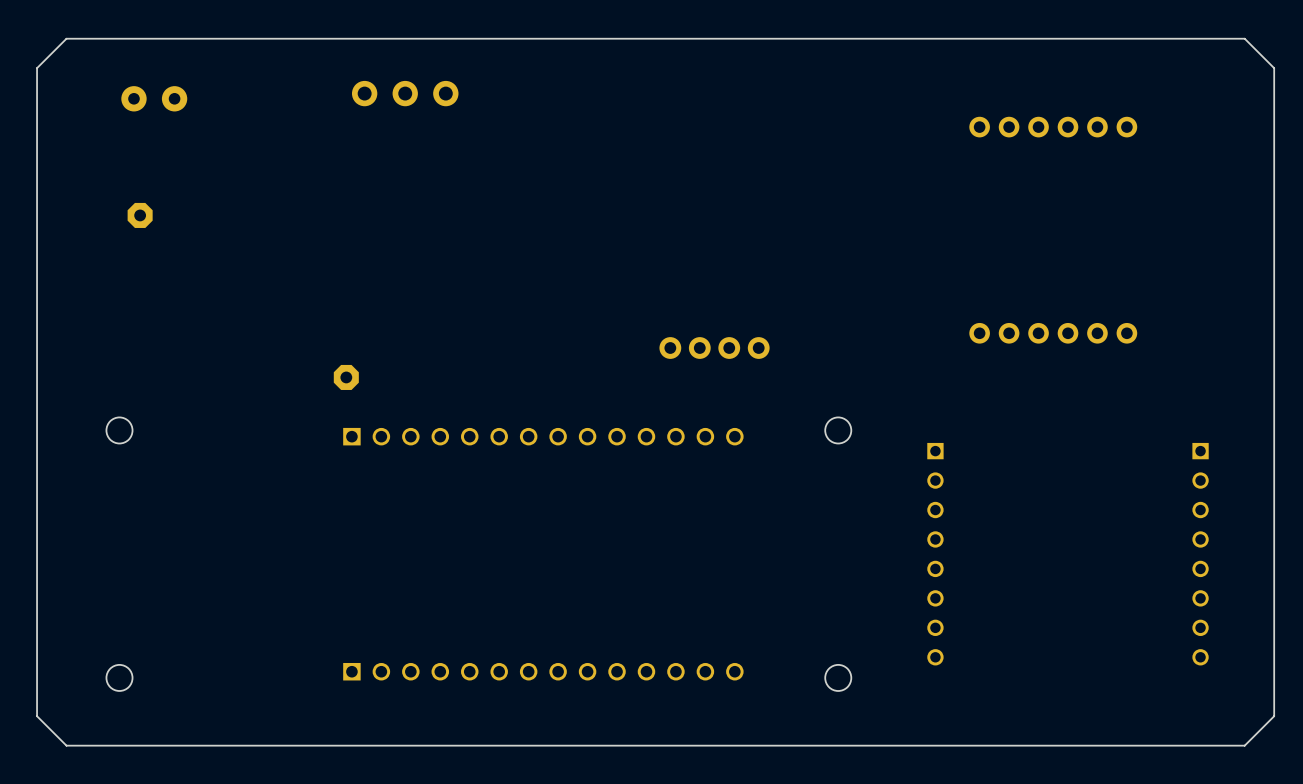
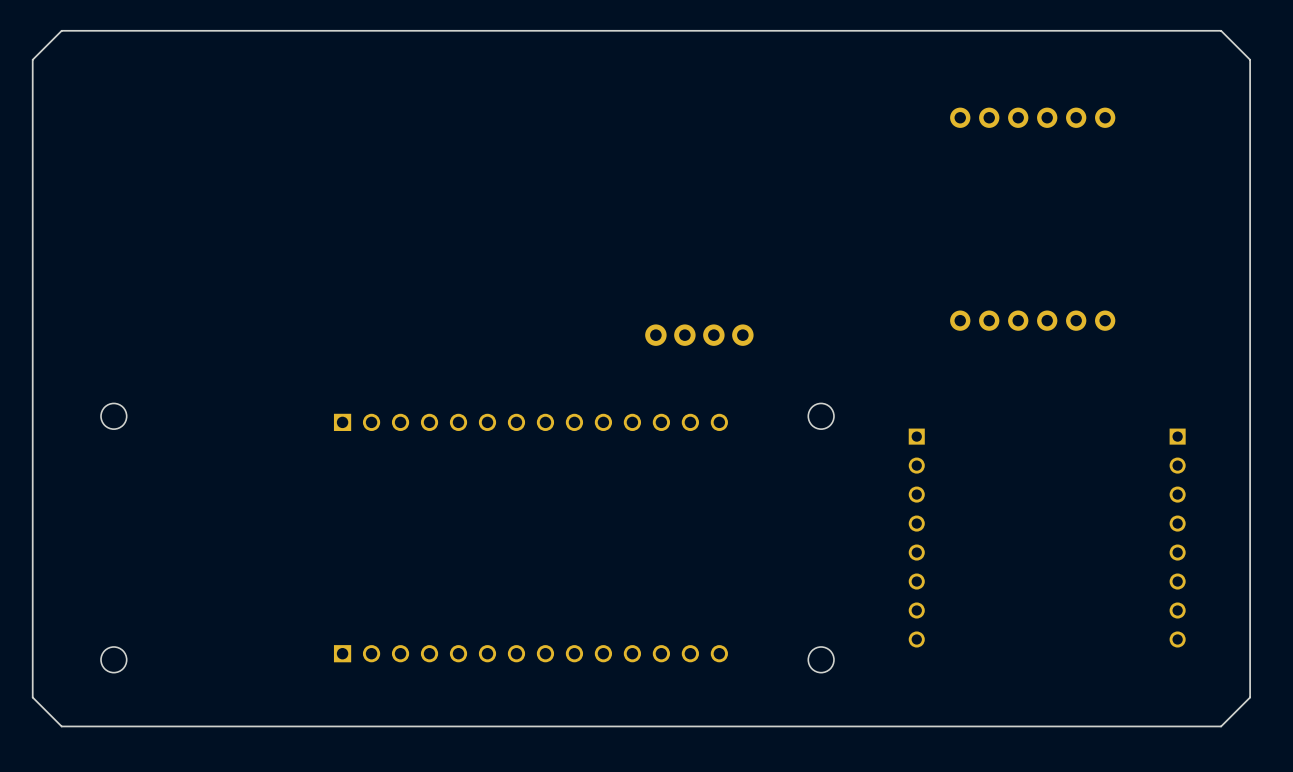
part: (405, 93) -> none
part: (154, 98) -> none
part: (140, 215) -> none
part: (346, 377) -> none

